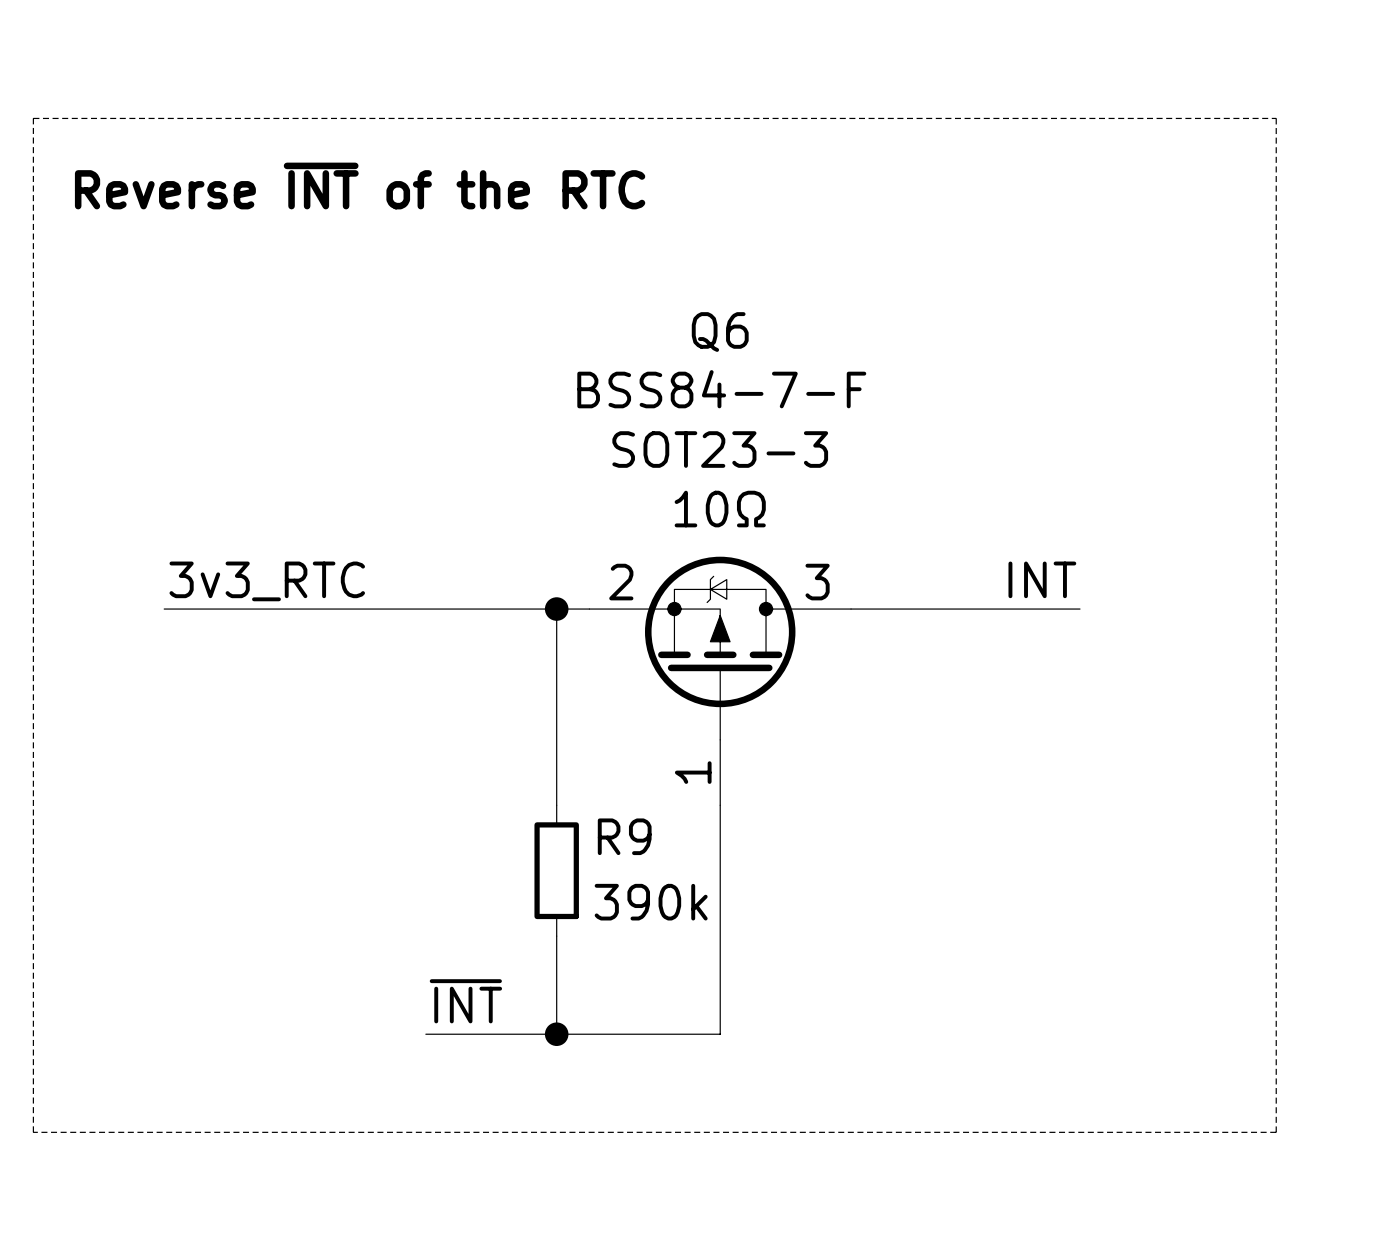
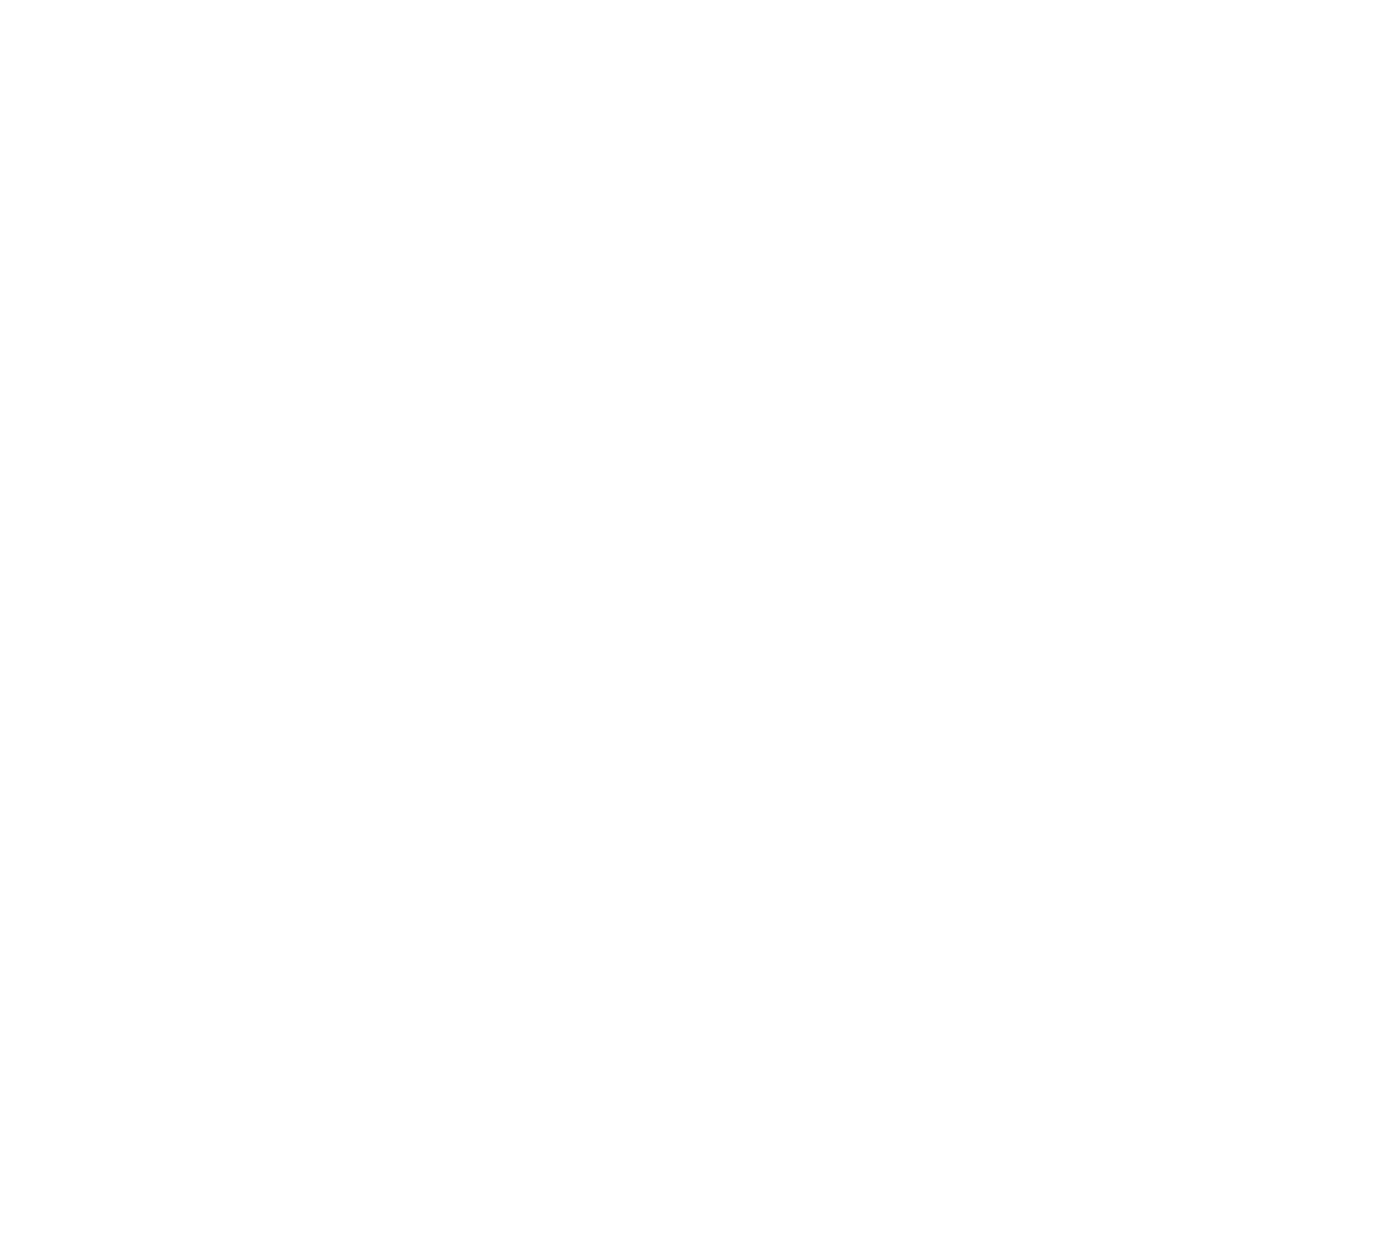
line: (33, 118) (33, 1132) (1276, 1132) (1276, 118) (33, 118) -> none
text: Reverse ~{INT} of the RTC (360, 186) -> none
label: INT (1042, 579) -> none
label: 3v3_RTC (267, 581) -> none
wire: (164, 609) (589, 609) -> none
wire: (556, 609) (556, 805) -> none
junction: (556, 609) -> none
wire: (851, 609) (1079, 609) -> none
Q6: BSS84-7-F (720, 680) -> none
wire: (720, 805) (720, 1034) (425, 1034) -> none
R9: 390k (556, 870) -> none
wire: (556, 936) (556, 1034) -> none
label: ~{INT} (465, 1001) -> none
junction: (556, 1034) -> none

